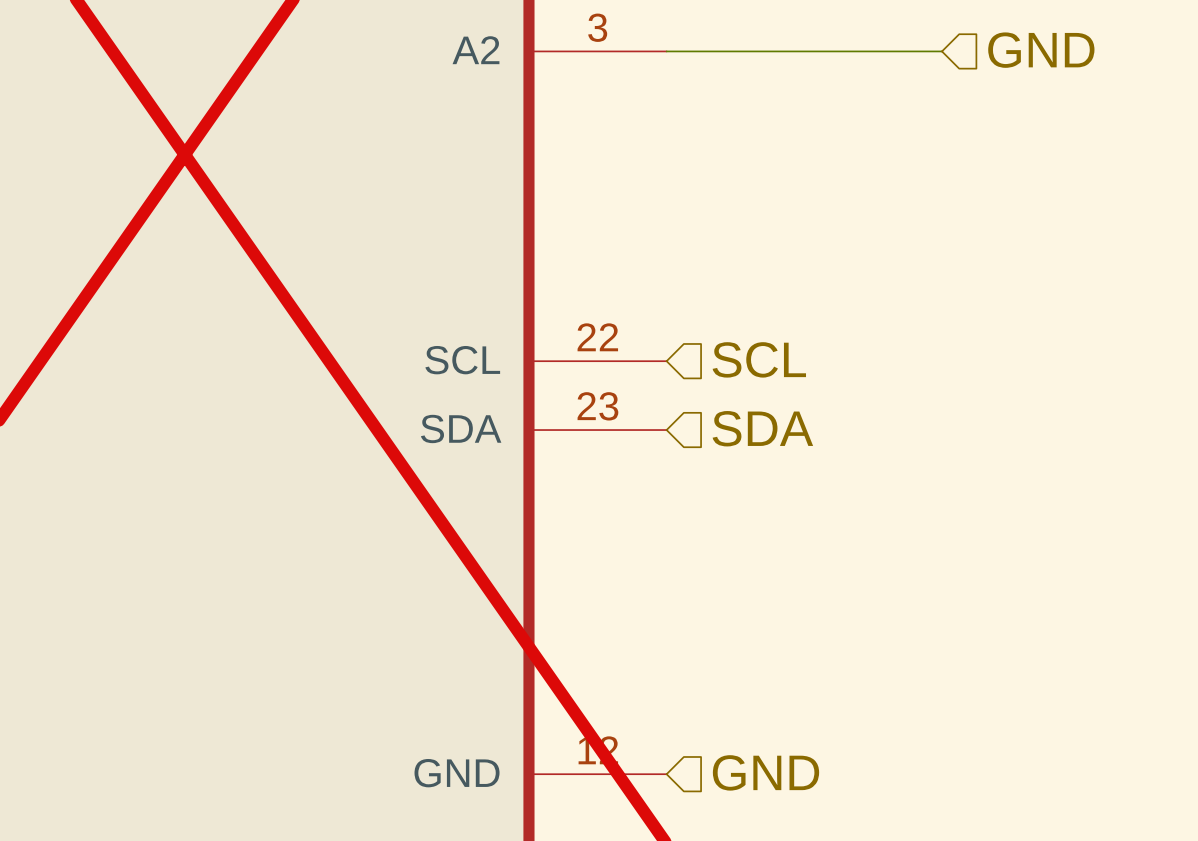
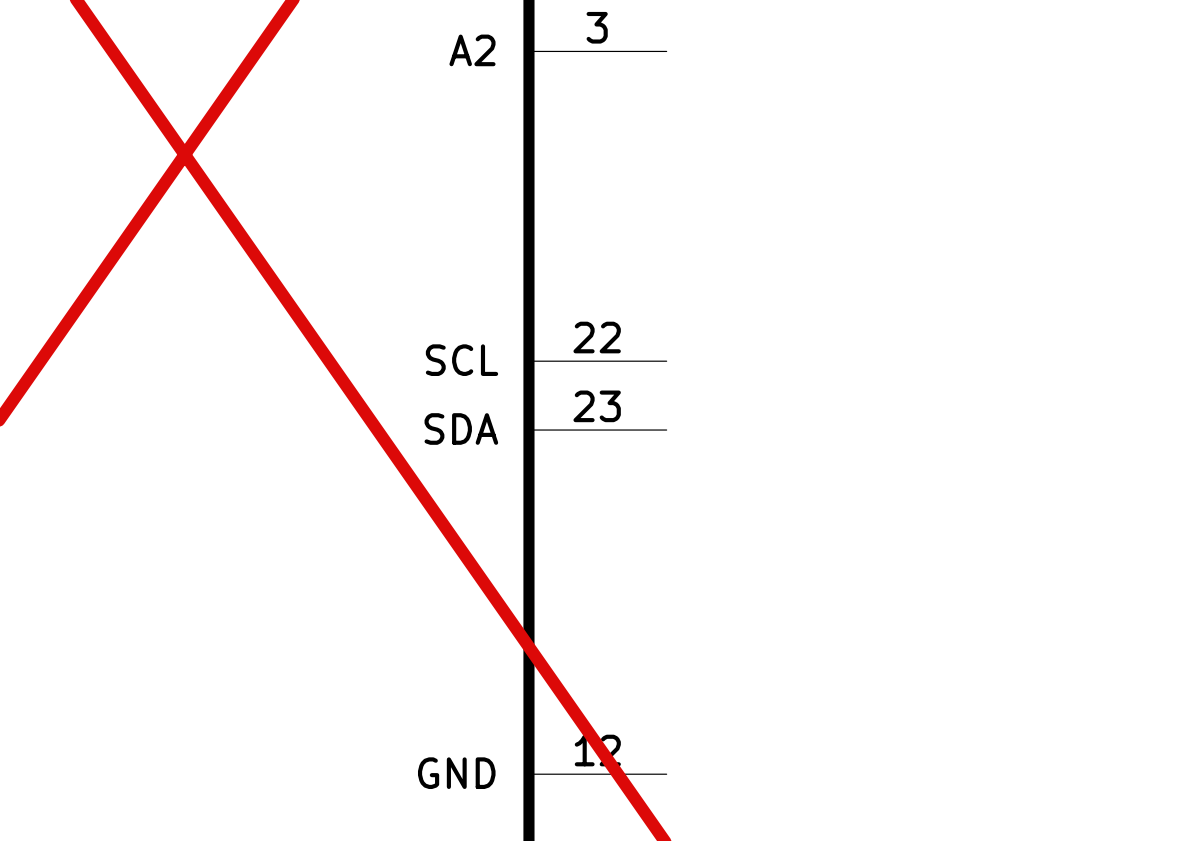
hierarchical label: GND (1041, 50) -> none
wire: (666, 51) (941, 51) -> none
hierarchical label: SCL (759, 359) -> none
hierarchical label: SDA (762, 428) -> none
hierarchical label: GND (766, 772) -> none

